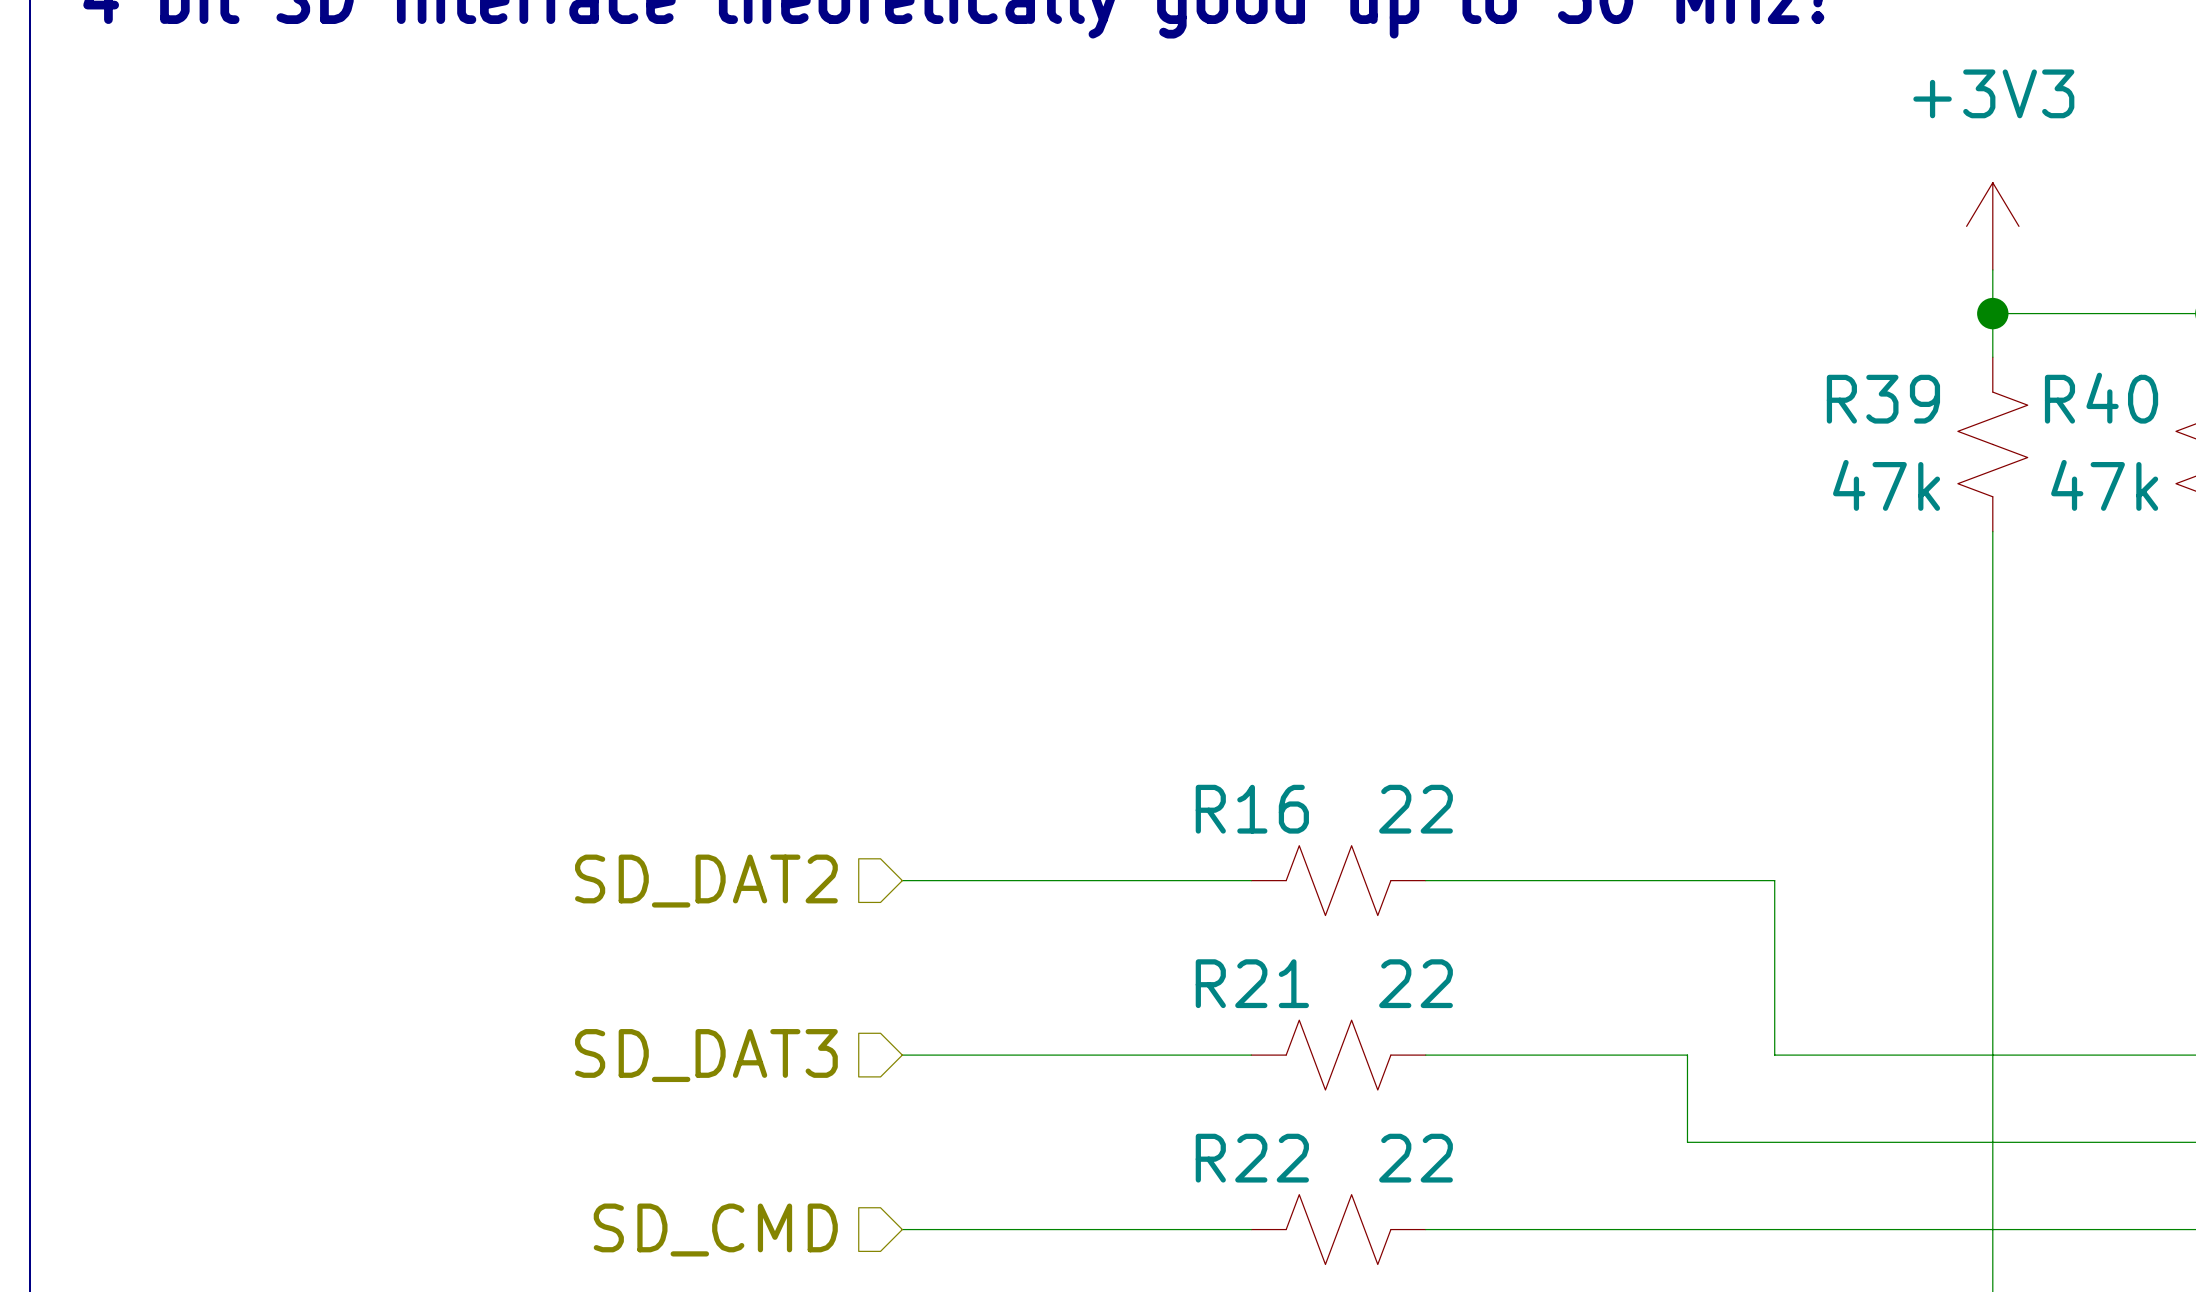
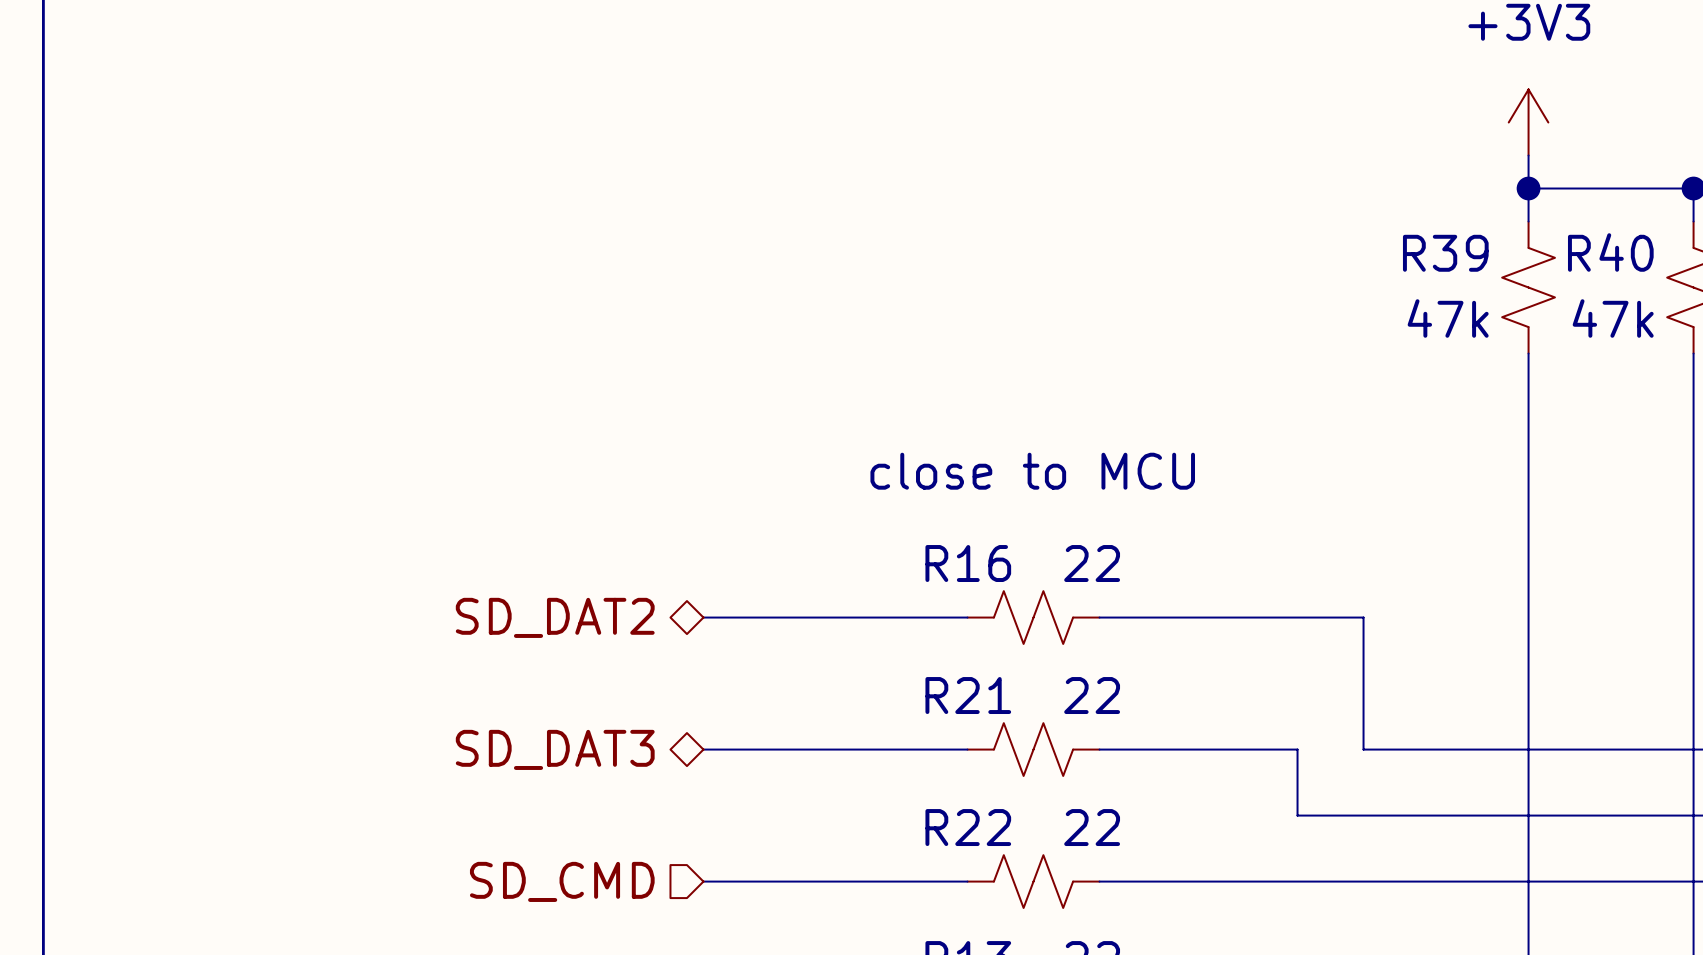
text: none -> close to MCU (1032, 471)
hierarchical label shape: input (706, 881) -> bidirectional (555, 617)
hierarchical label shape: input (706, 1055) -> bidirectional (555, 749)

